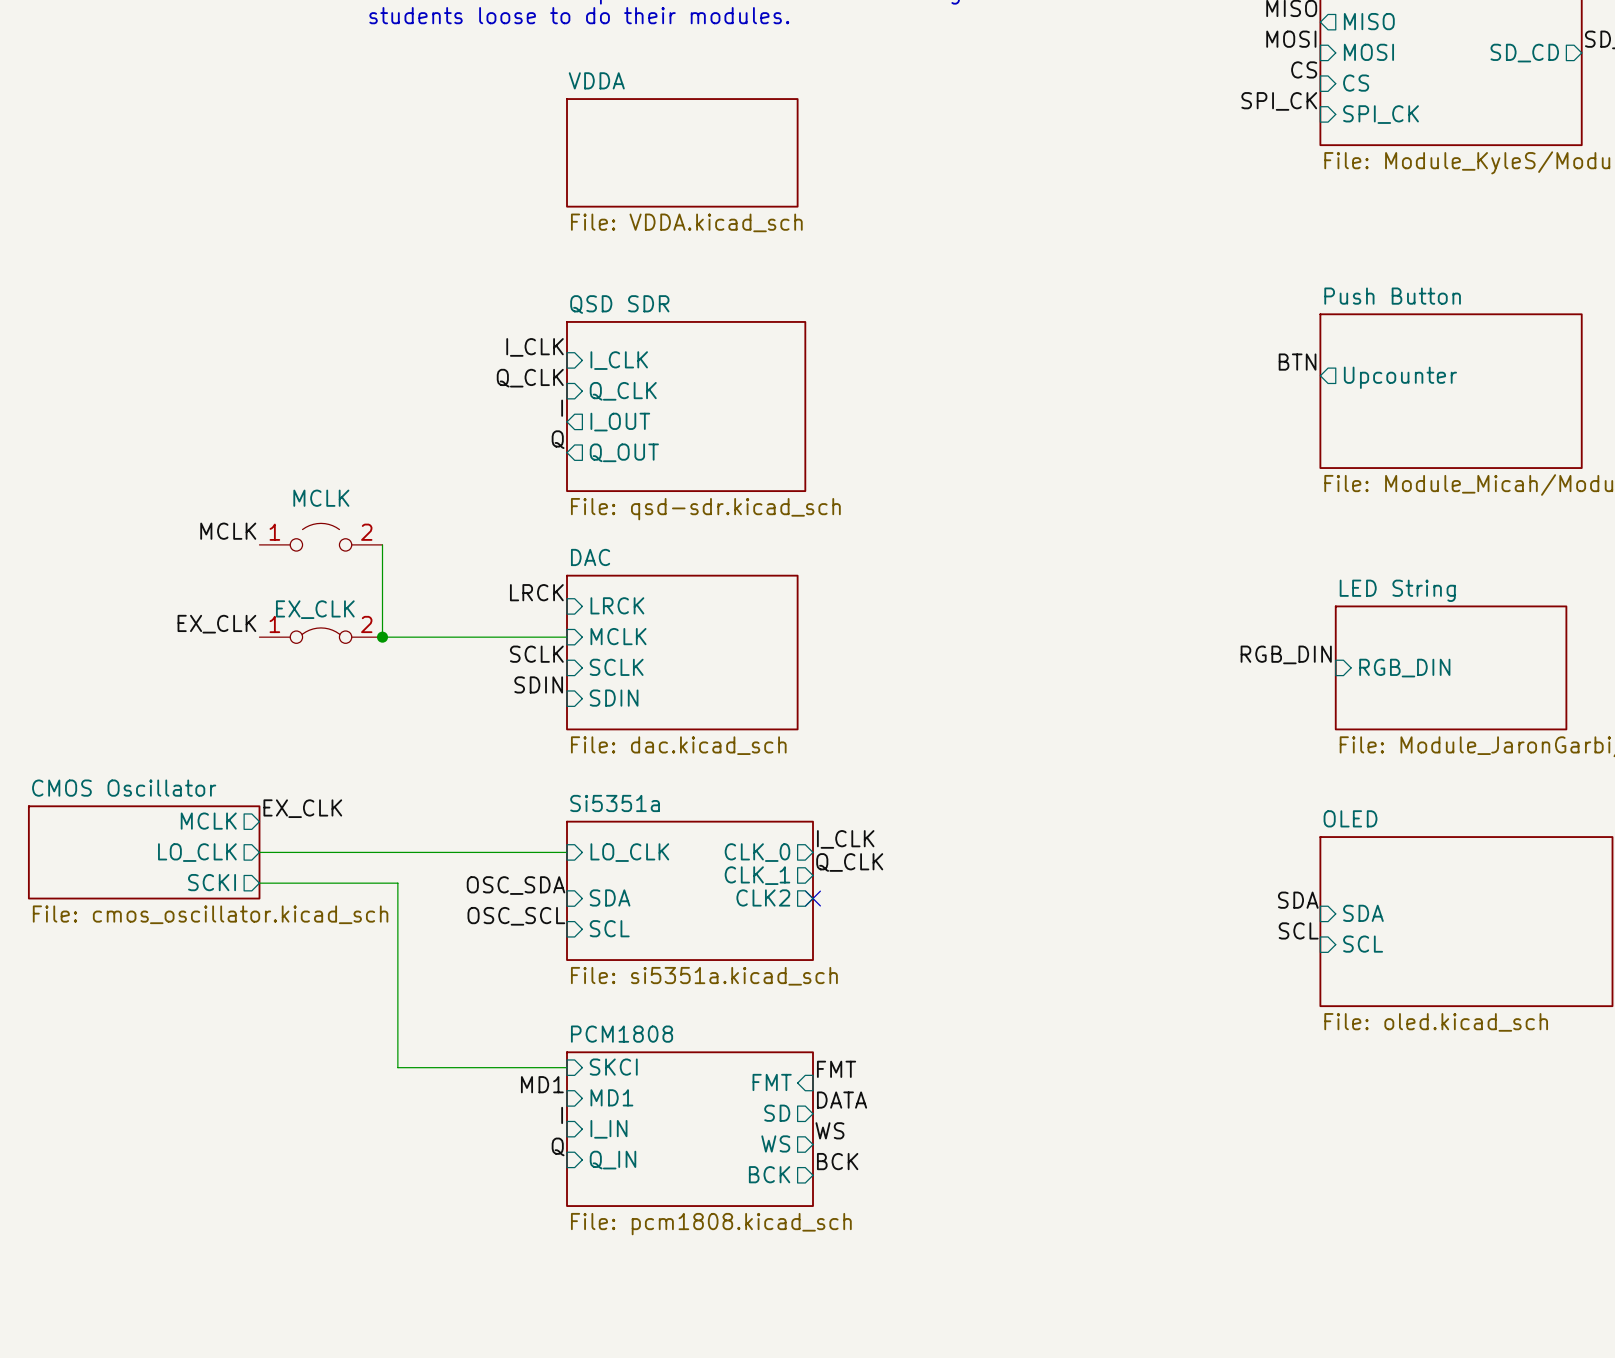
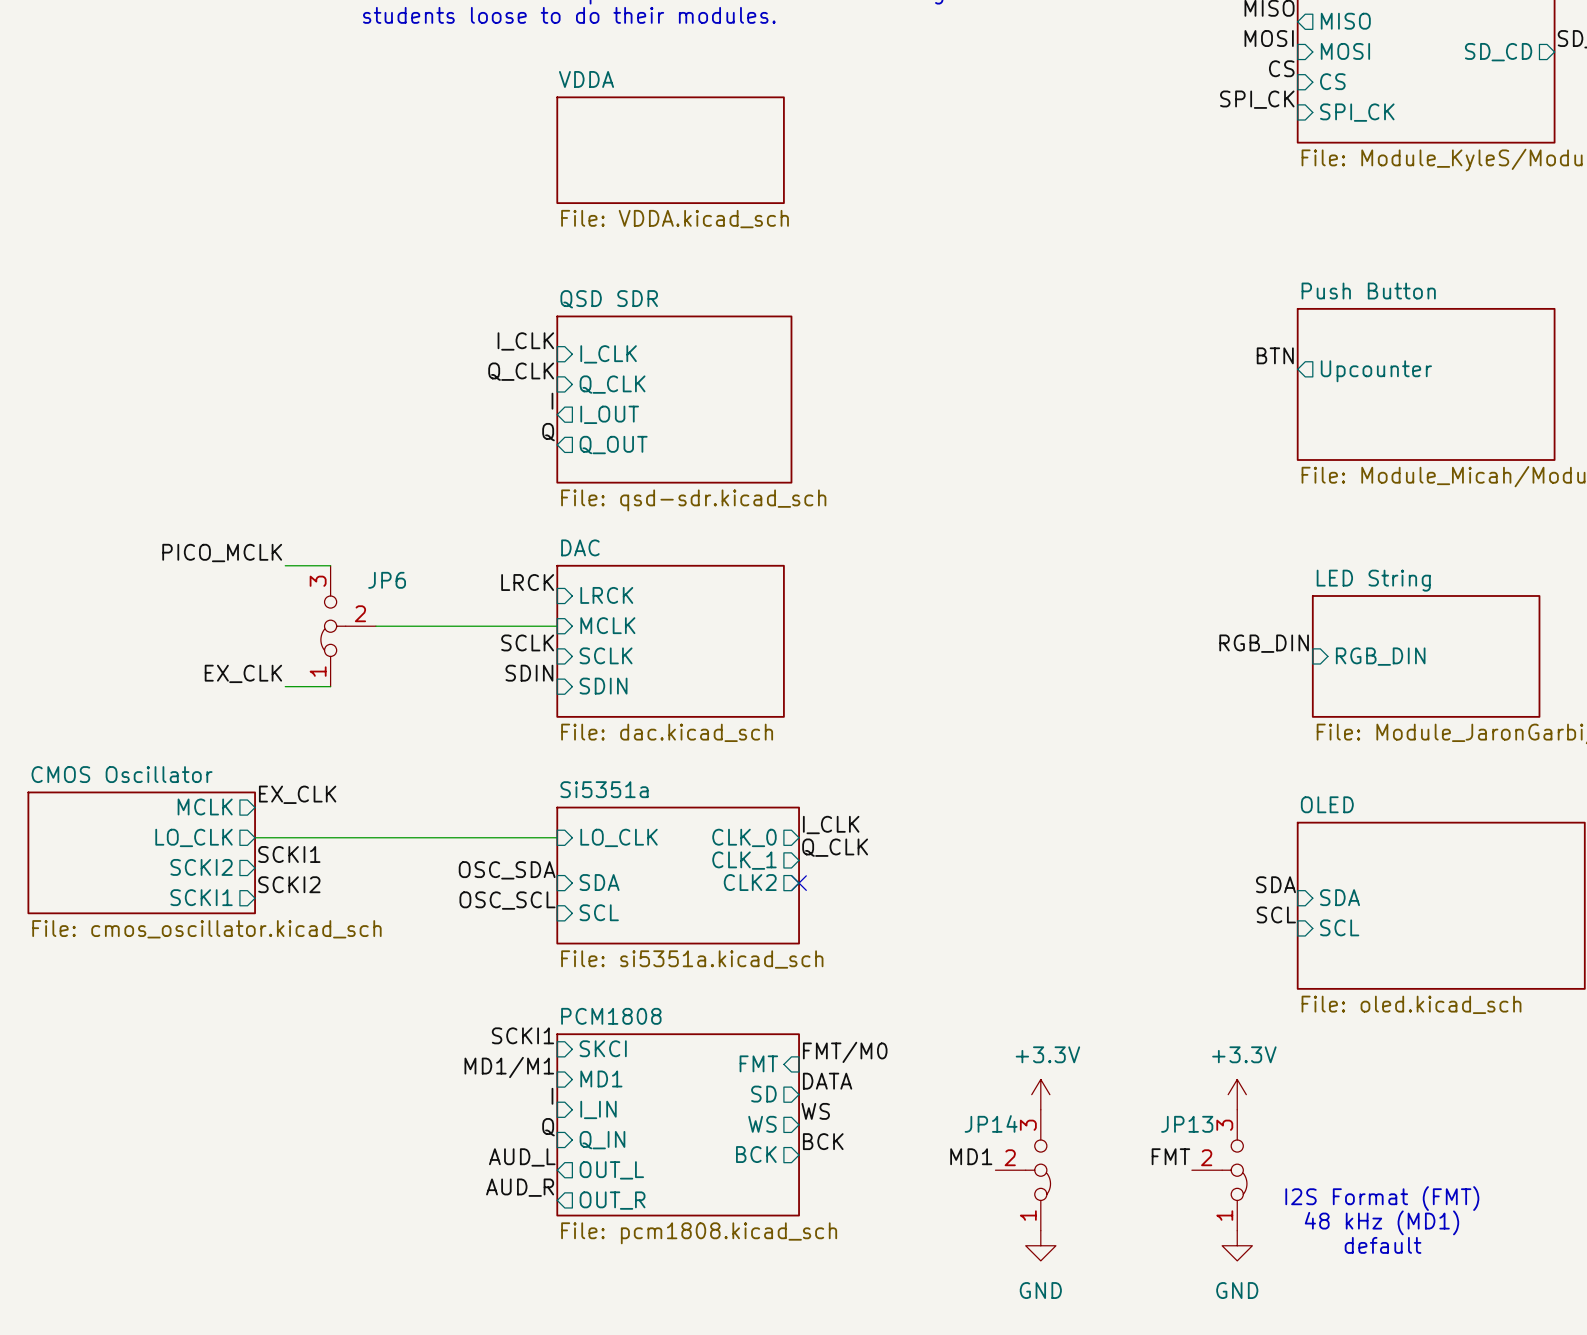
label: MCLK (228, 531) -> PICO_MCLK (222, 553)
part: MCLK (321, 537) -> none
wire: (382, 544) (382, 637) -> none
wire: none -> (285, 565) (330, 565)
label position: EX_CLK (216, 624) -> EX_CLK (243, 673)
part: EX_CLK (321, 635) -> none
JP6: none -> (348, 626)
junction: (382, 637) -> none
wire: none -> (285, 686) (330, 686)
sheet CMOS Oscillator: File: cmos_oscillator.kicad_sch (144, 852) -> none
sheet CMOS Oscillator: none -> File: cmos_oscillator.kicad_sch (141, 852)
label: none -> SCKI1 (289, 854)
sheet pin: SCKI (212, 882) -> SCKI2 (201, 867)
wire: (259, 883) (397, 883) (397, 1067) (567, 1067) -> none
label: none -> SCKI2 (289, 884)
sheet pin: none -> SCKI1 (201, 897)
sheet PCM1808 shape: [566, 1051, 814, 1207] -> [556, 1033, 800, 1217]
label: none -> SCKI1 (522, 1035)
label: FMT (836, 1069) -> FMT/M0 (845, 1052)
label: MD1 (542, 1084) -> MD1/M1 (509, 1067)
power symbol: none -> +3.3V (1040, 1094)
power symbol: none -> +3.3V (1237, 1094)
label: none -> MD1 (971, 1156)
label: none -> FMT (1170, 1156)
label: none -> AUD_L (522, 1157)
sheet pin: none -> OUT_L (611, 1170)
JP14: none -> (1022, 1170)
JP13: none -> (1219, 1170)
label: none -> AUD_R (520, 1187)
text: none -> I2S Format (FMT) (1382, 1198)
sheet pin: none -> OUT_R (612, 1200)
text: none -> 48 kHz (MD1) (1381, 1222)
power symbol: none -> GND (1040, 1245)
power symbol: none -> GND (1237, 1245)
text: none -> default (1383, 1245)

